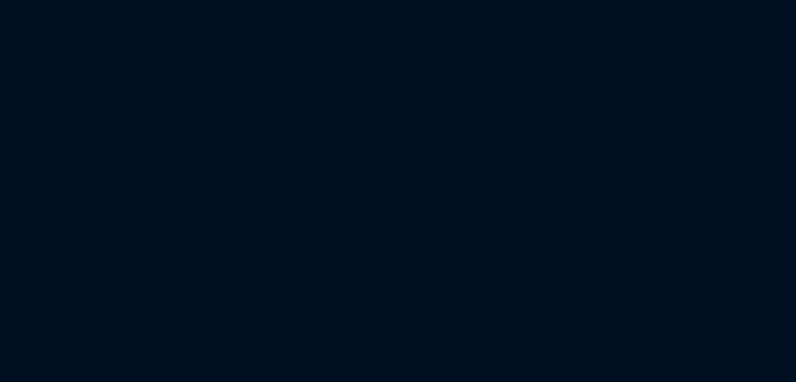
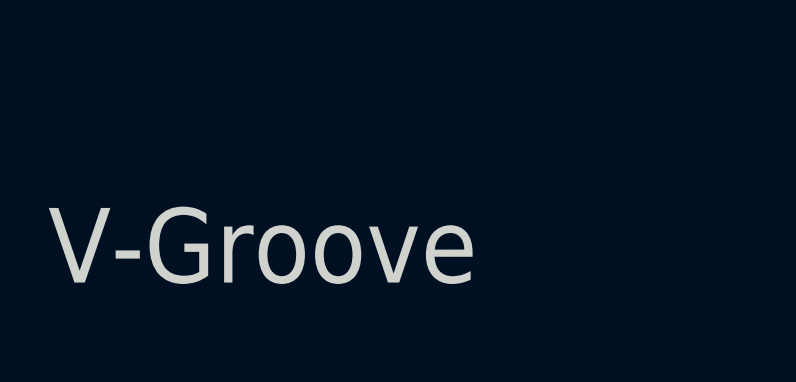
text: none -> V-Groove (260, 245)

